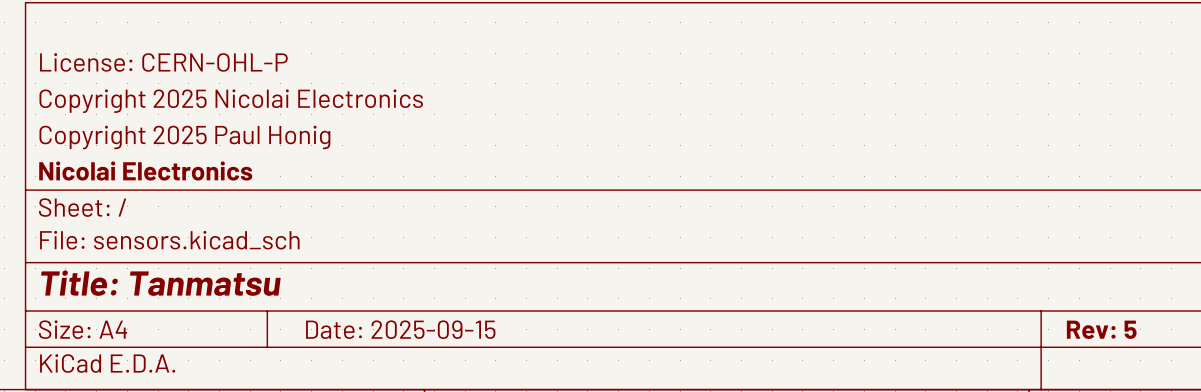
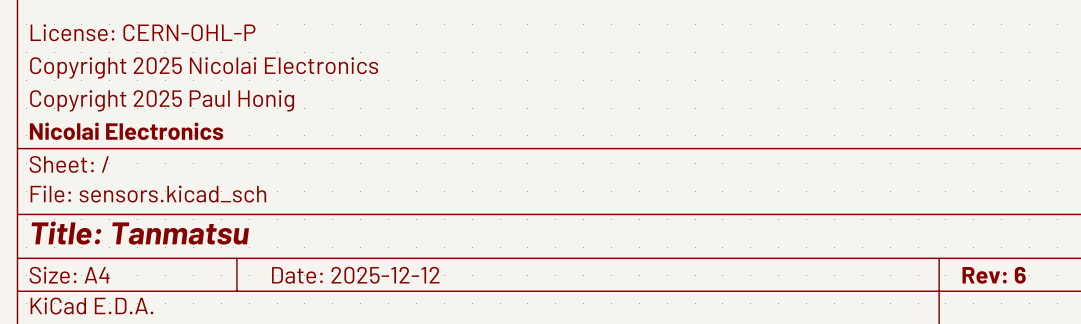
title block: Date: 2025-09-15 (400, 329) -> Date: 2025-12-12 (355, 275)
title block: Rev: 5 (1101, 329) -> Rev: 6 (994, 275)

